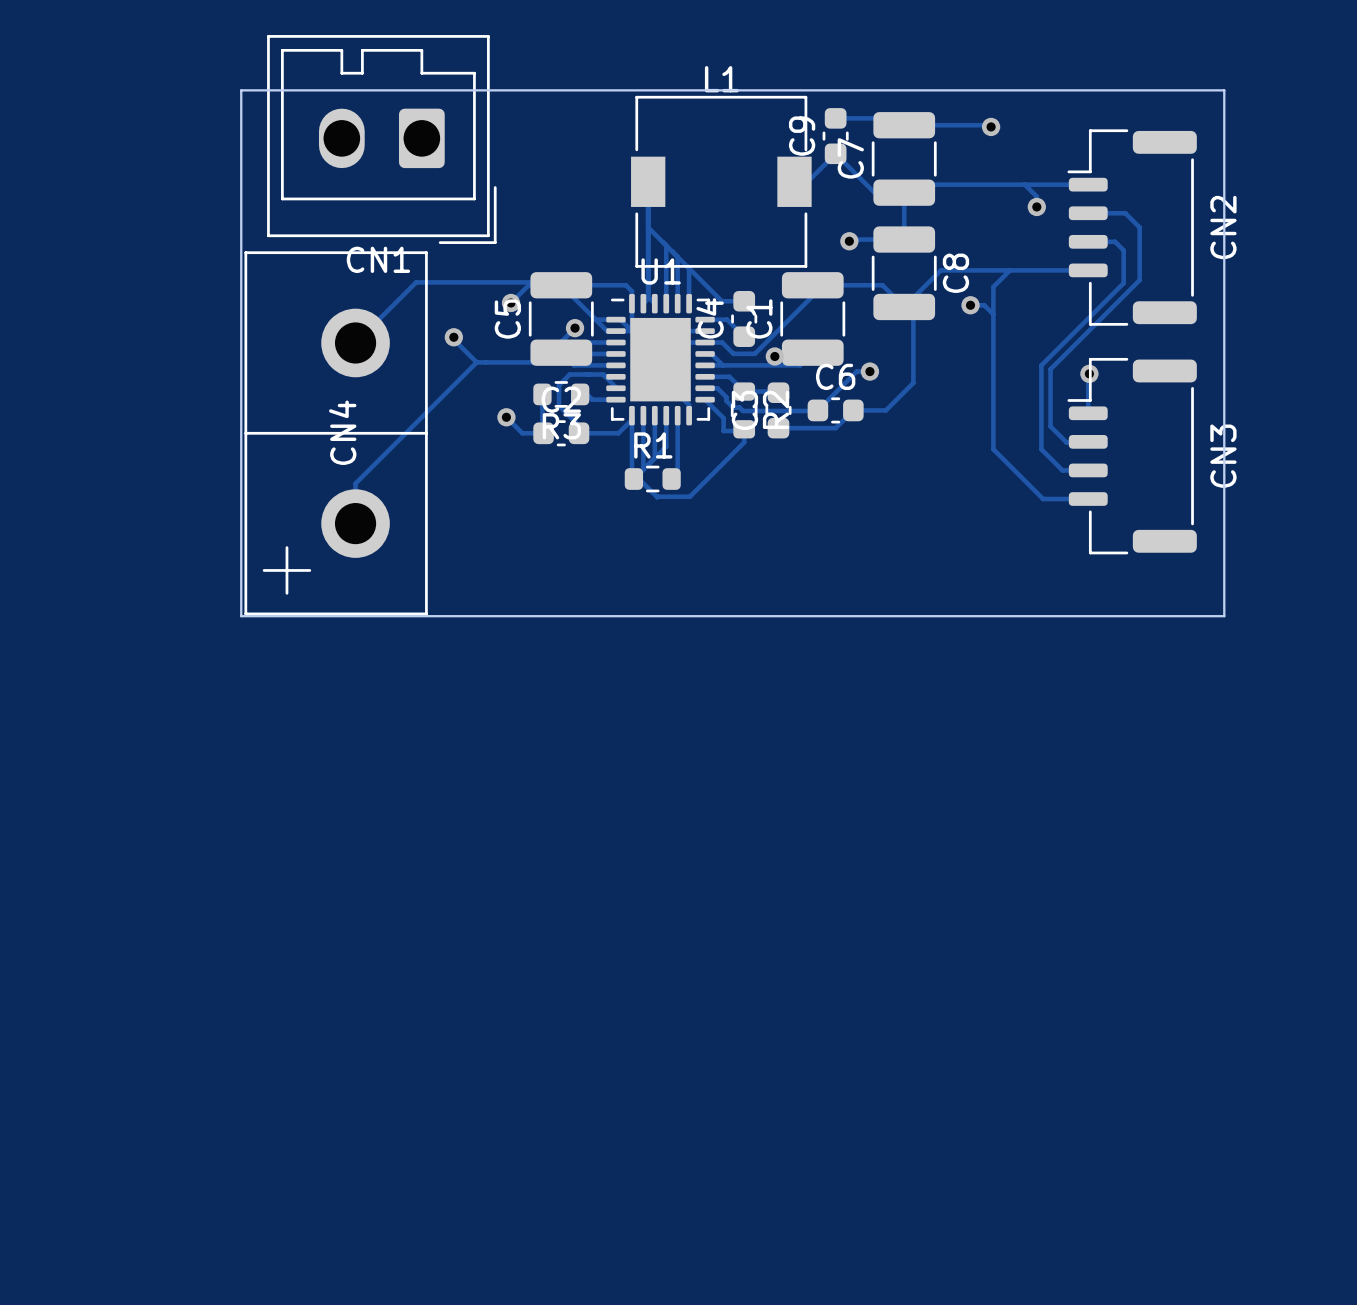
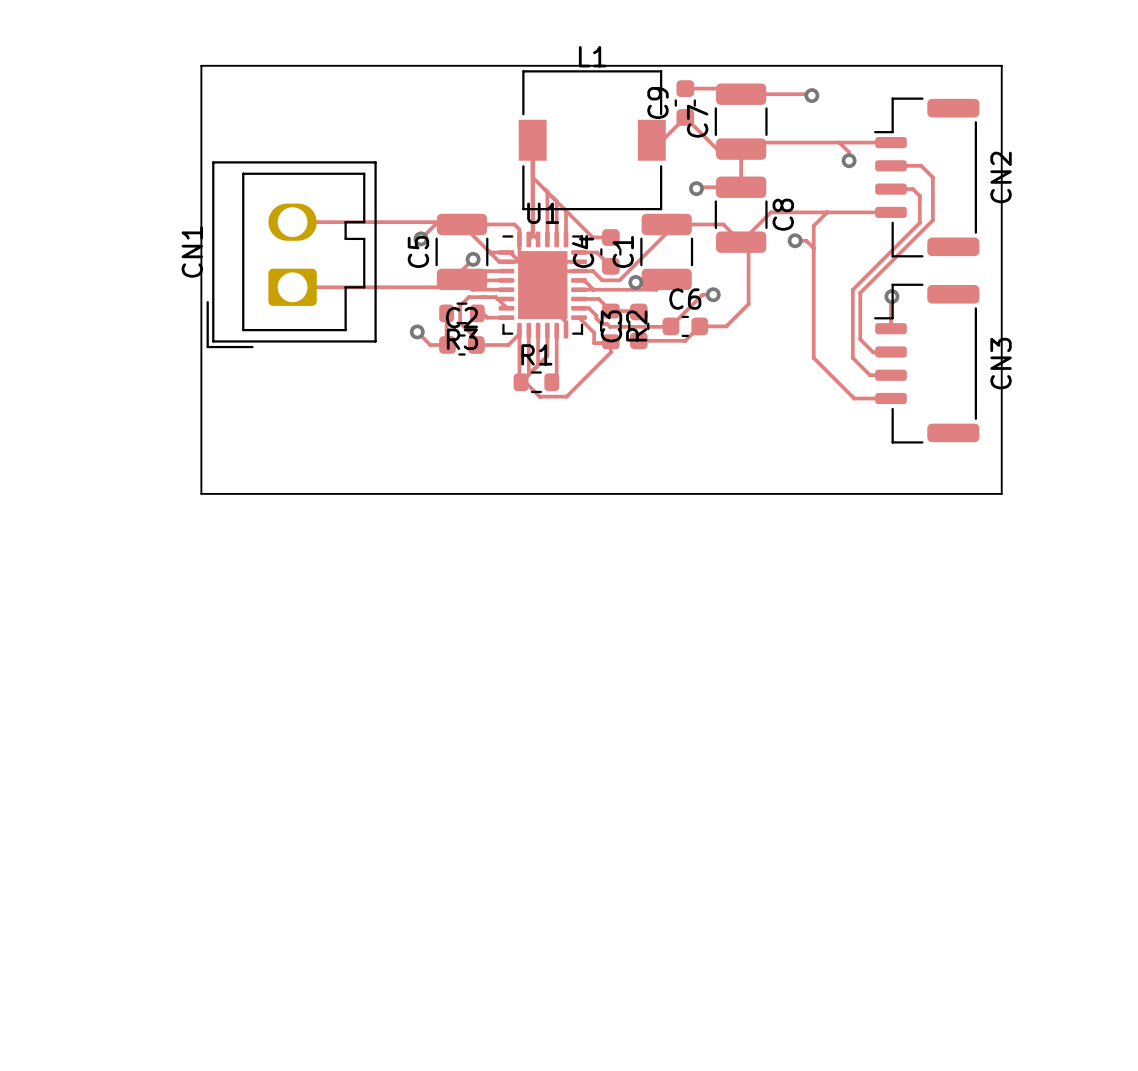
CN1 rotation: 0° (381, 139) -> 90° clockwise (291, 254)
CN1 position: (381, 139) -> (291, 254)
track: (416, 282) (355, 342) -> (343, 222) (292, 222)
track: (453, 337) (453, 339) (476, 362) (355, 483) (355, 523) -> none
via: (453, 337) -> none
track: none -> (292, 287) (393, 287)
CN4: (336, 433) -> none

